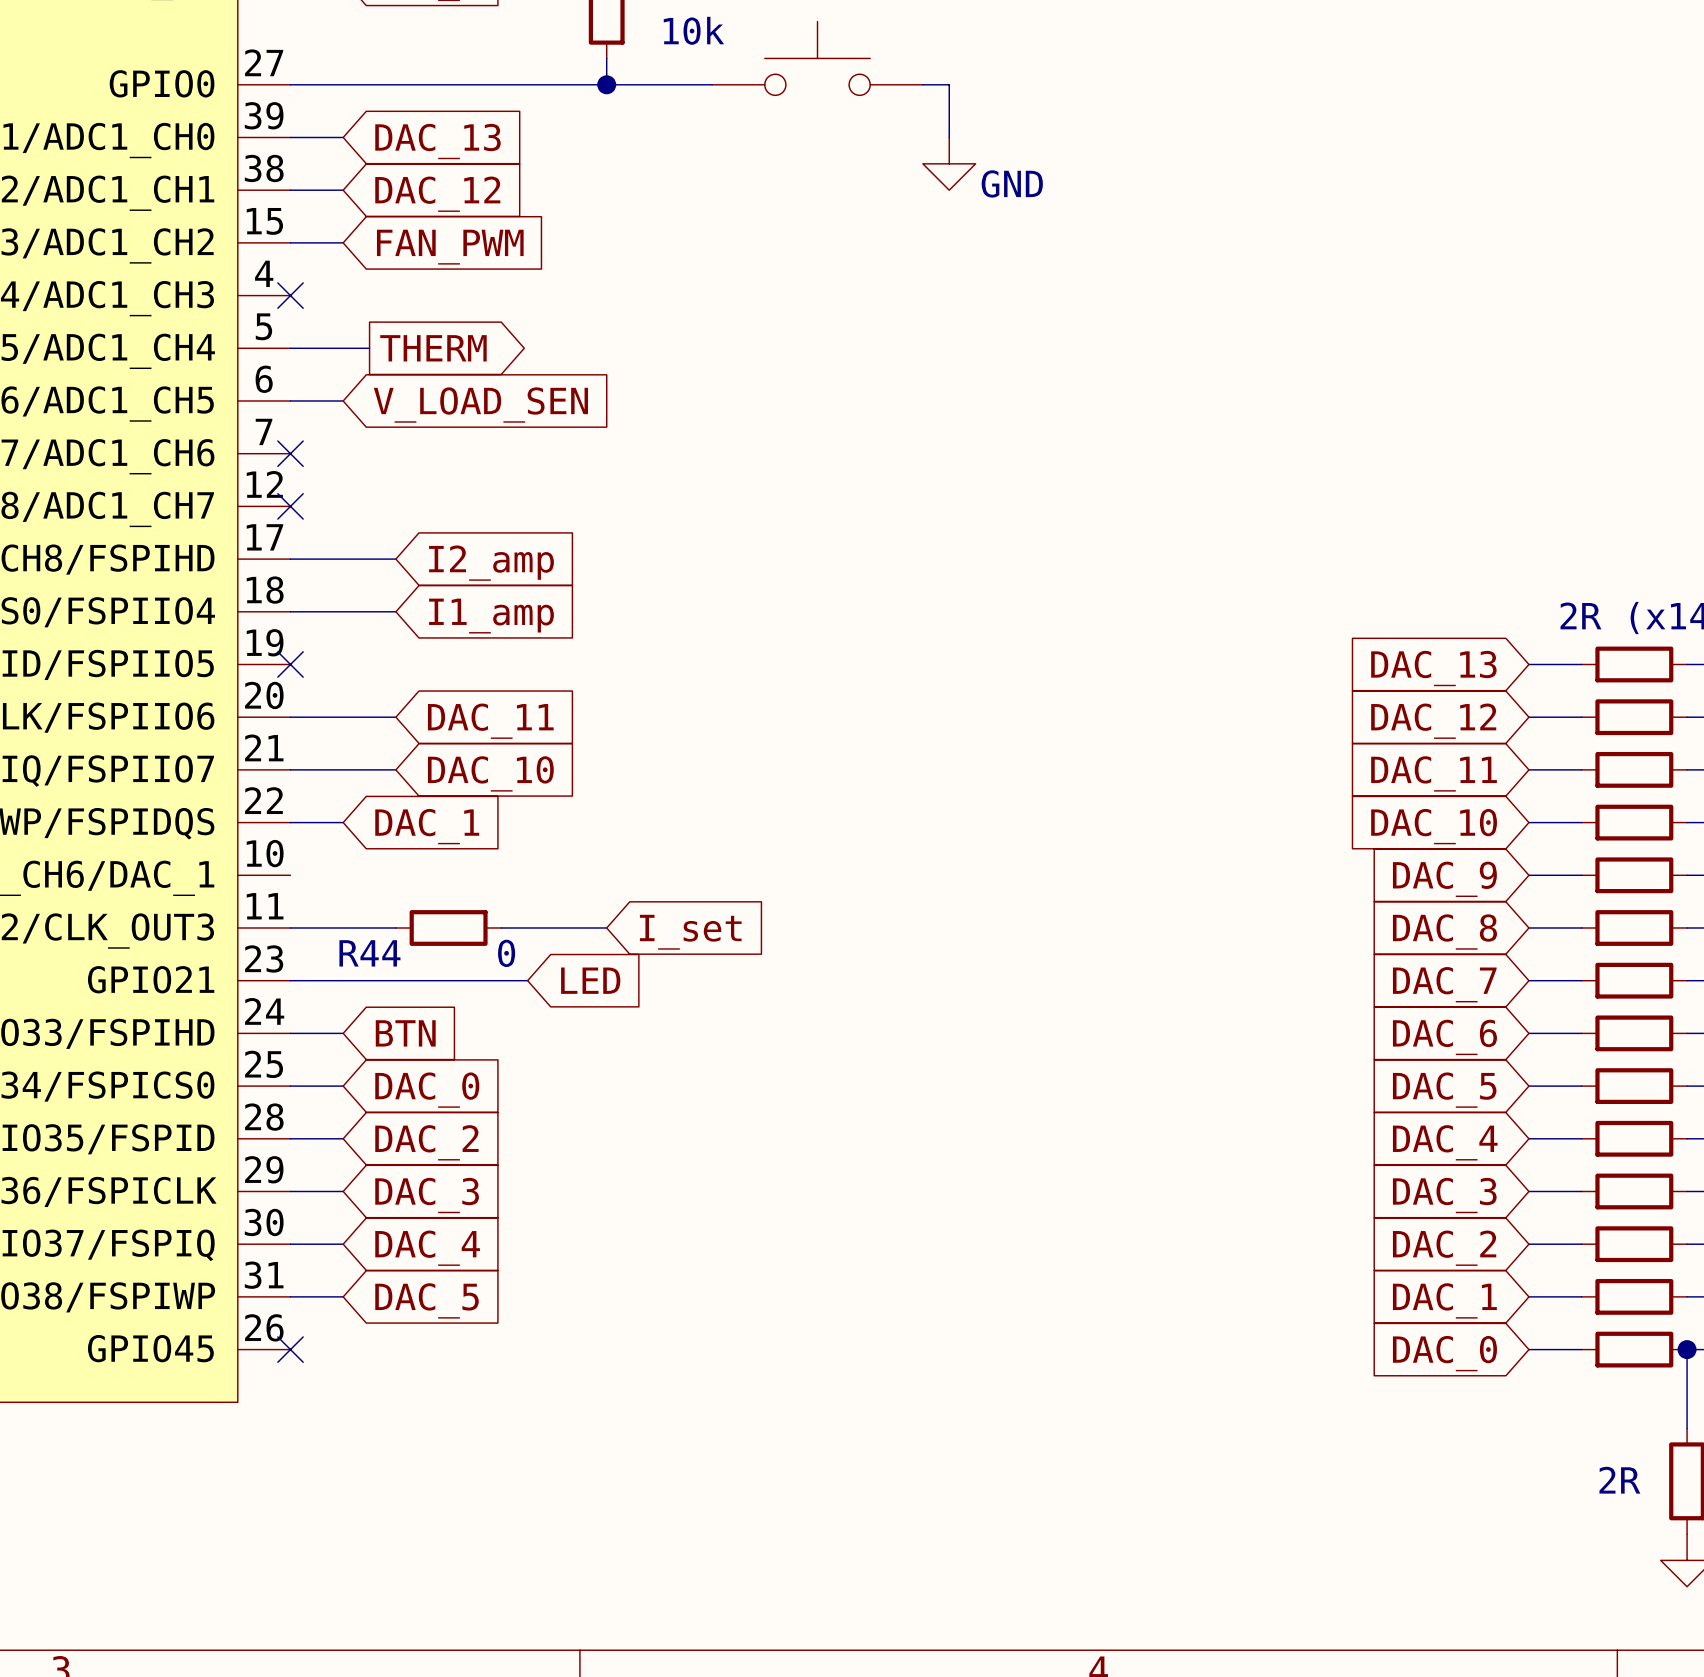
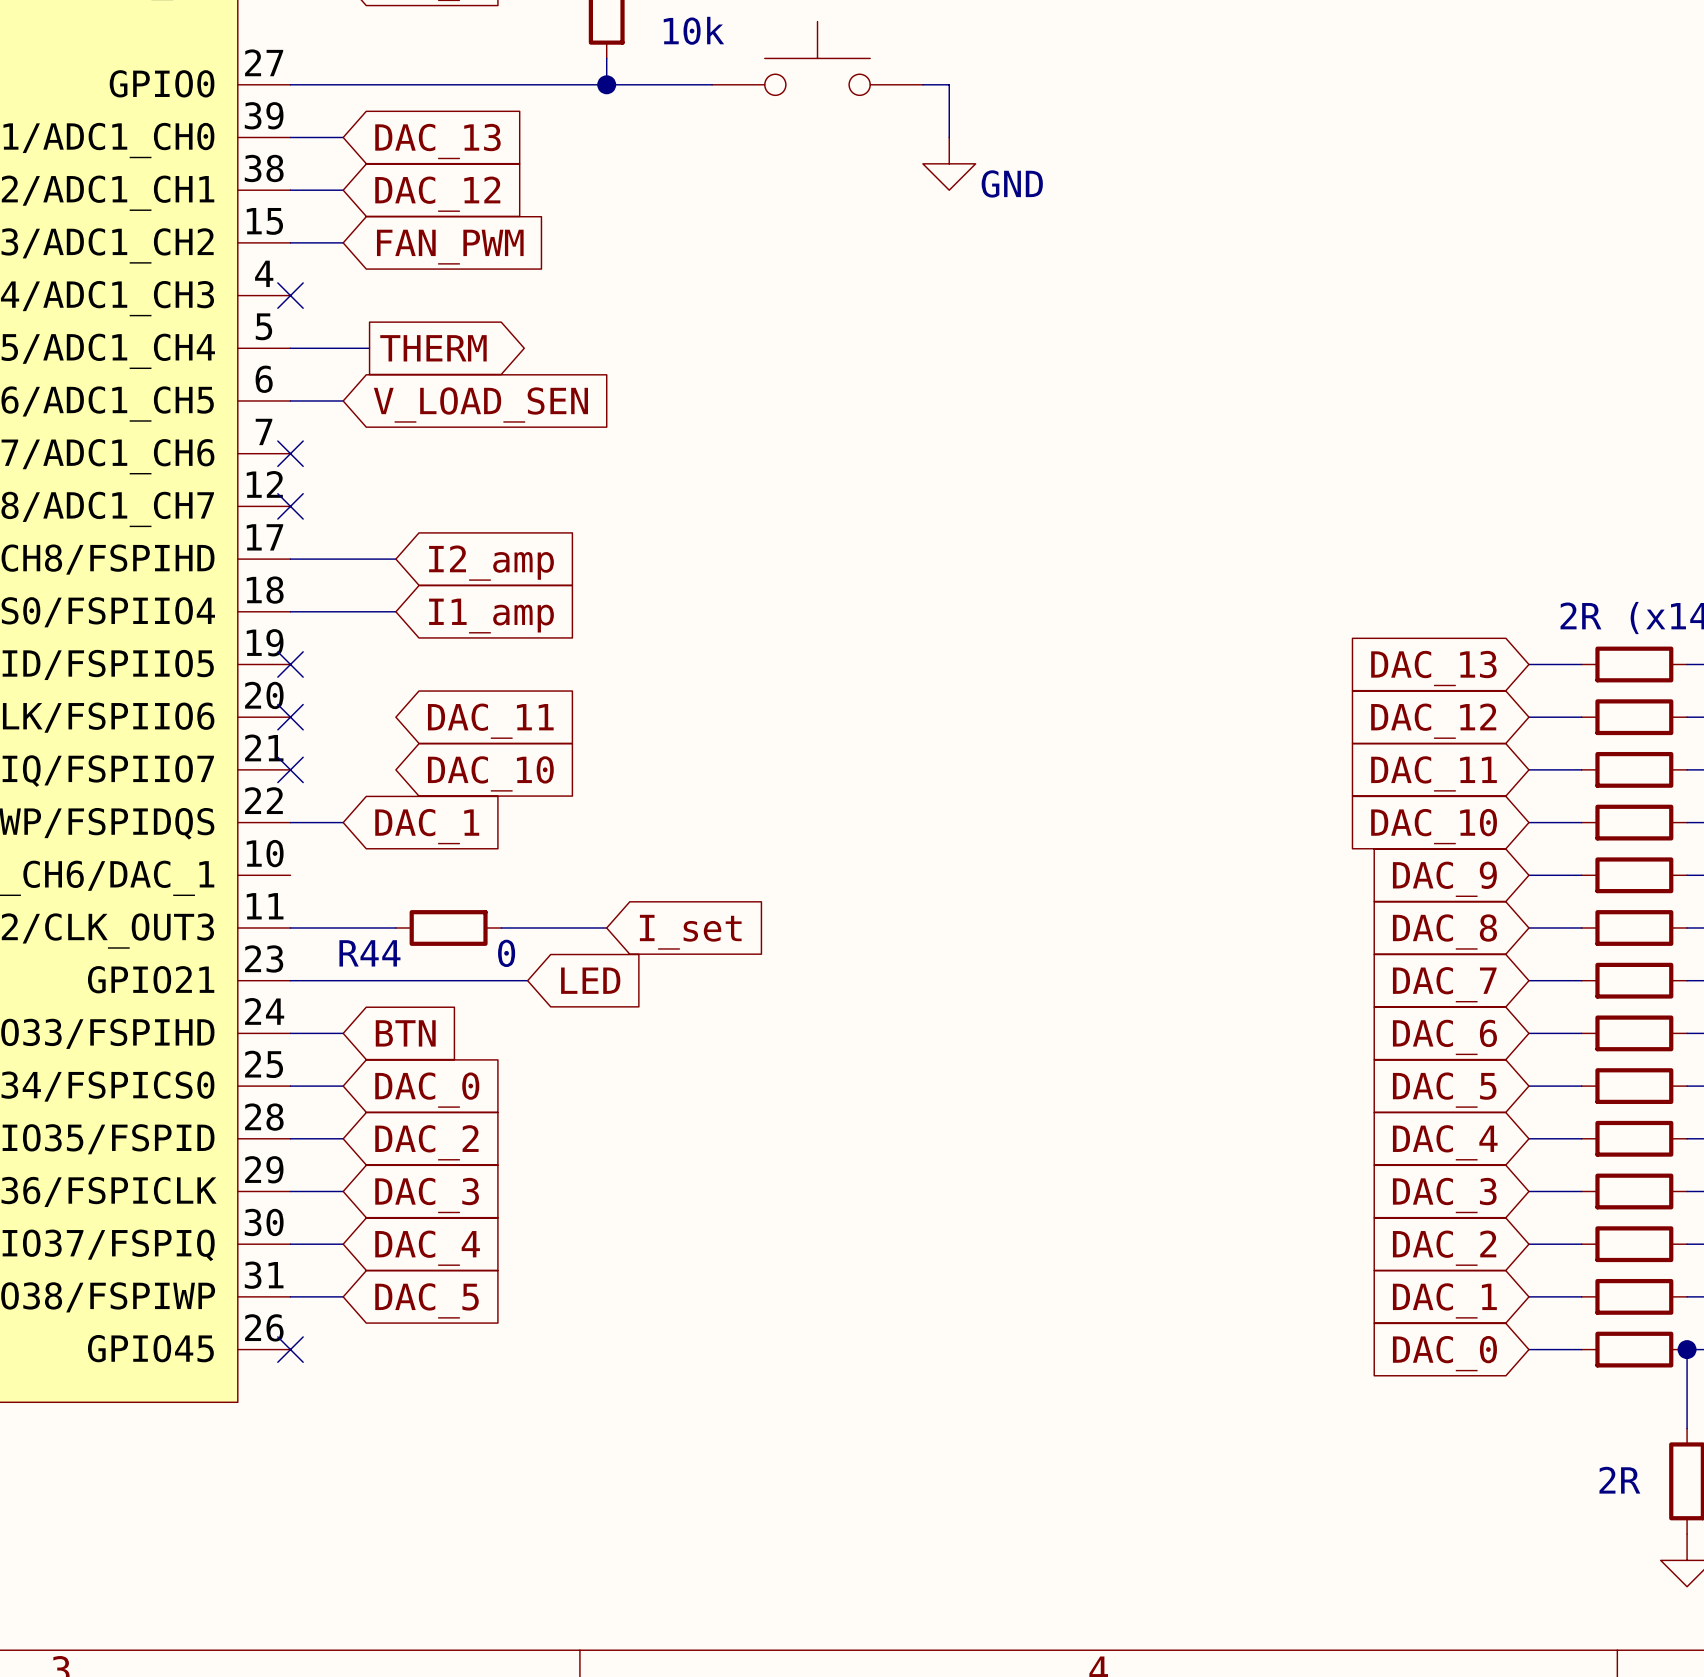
wire: (290, 717) (395, 717) -> none
no-connect mark: none -> (290, 717)
wire: (290, 769) (395, 769) -> none
no-connect mark: none -> (290, 769)

